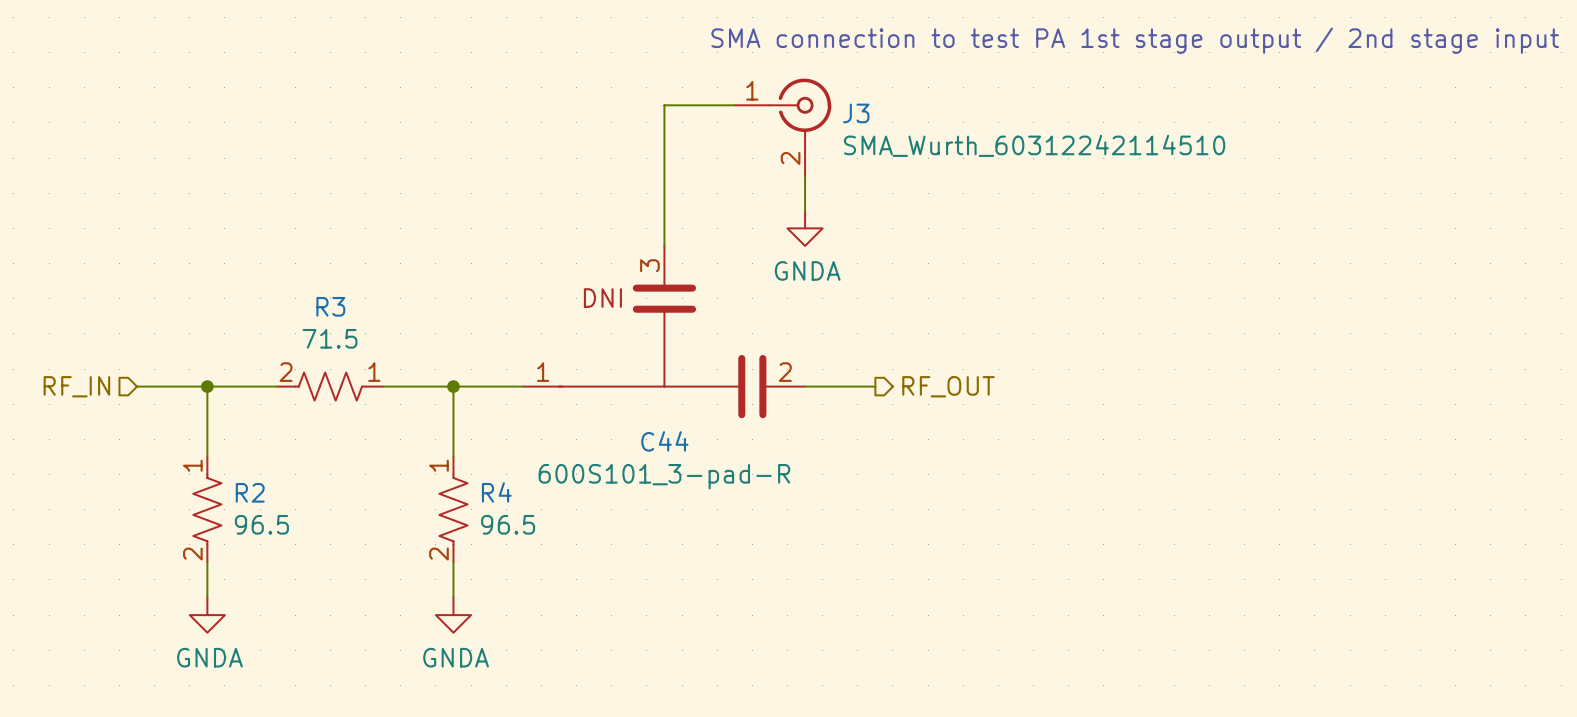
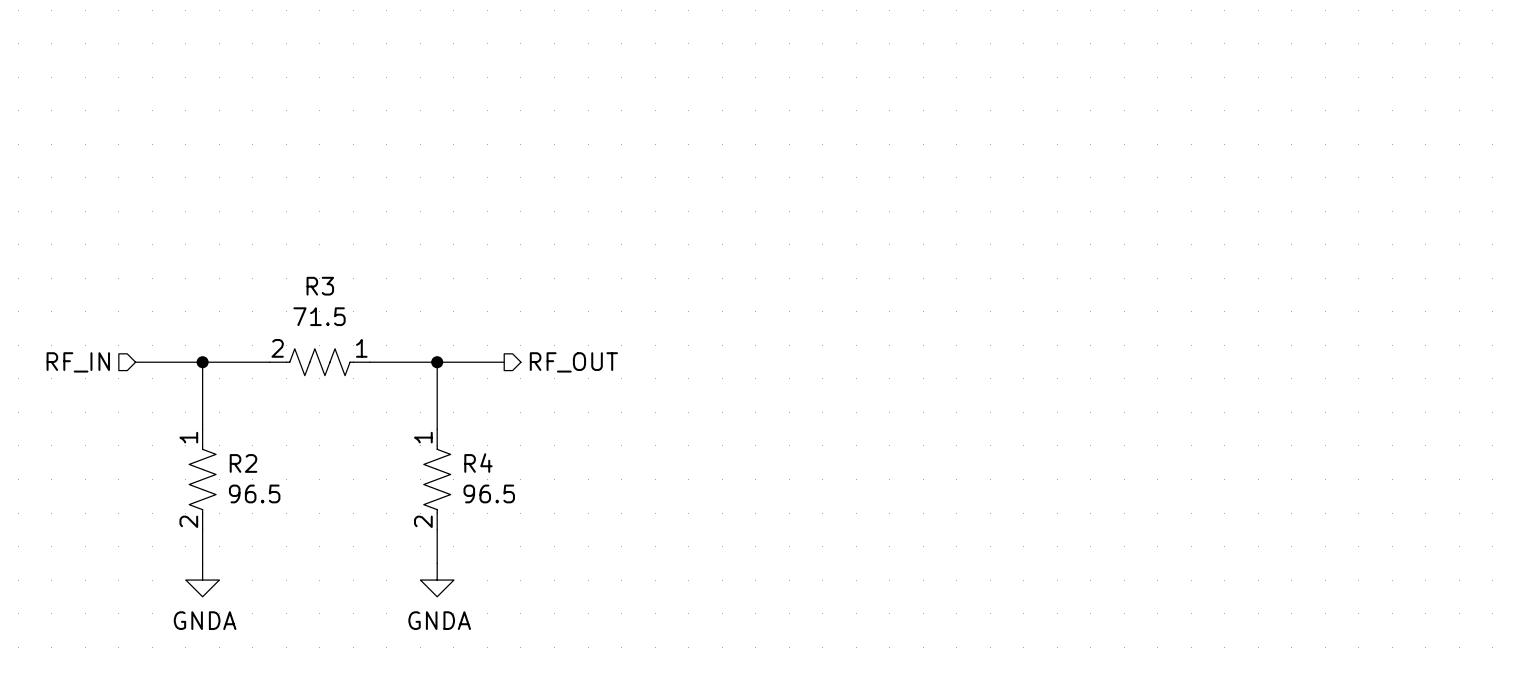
text: SMA connection to test PA 1st stage output / 2nd stage input (1135, 40) -> none
wire: (734, 105) (664, 105) (664, 245) -> none
J3: SMA_Wurth_60312242114510 (783, 127) -> none
wire: (805, 175) (805, 210) -> none
power symbol: GNDA (805, 228) -> none
C44: 600S101_3-pad-R (664, 332) -> none
hierarchical label: none -> RF_OUT (573, 362)
wire: (805, 386) (875, 386) -> none
hierarchical label: RF_OUT (948, 386) -> none

